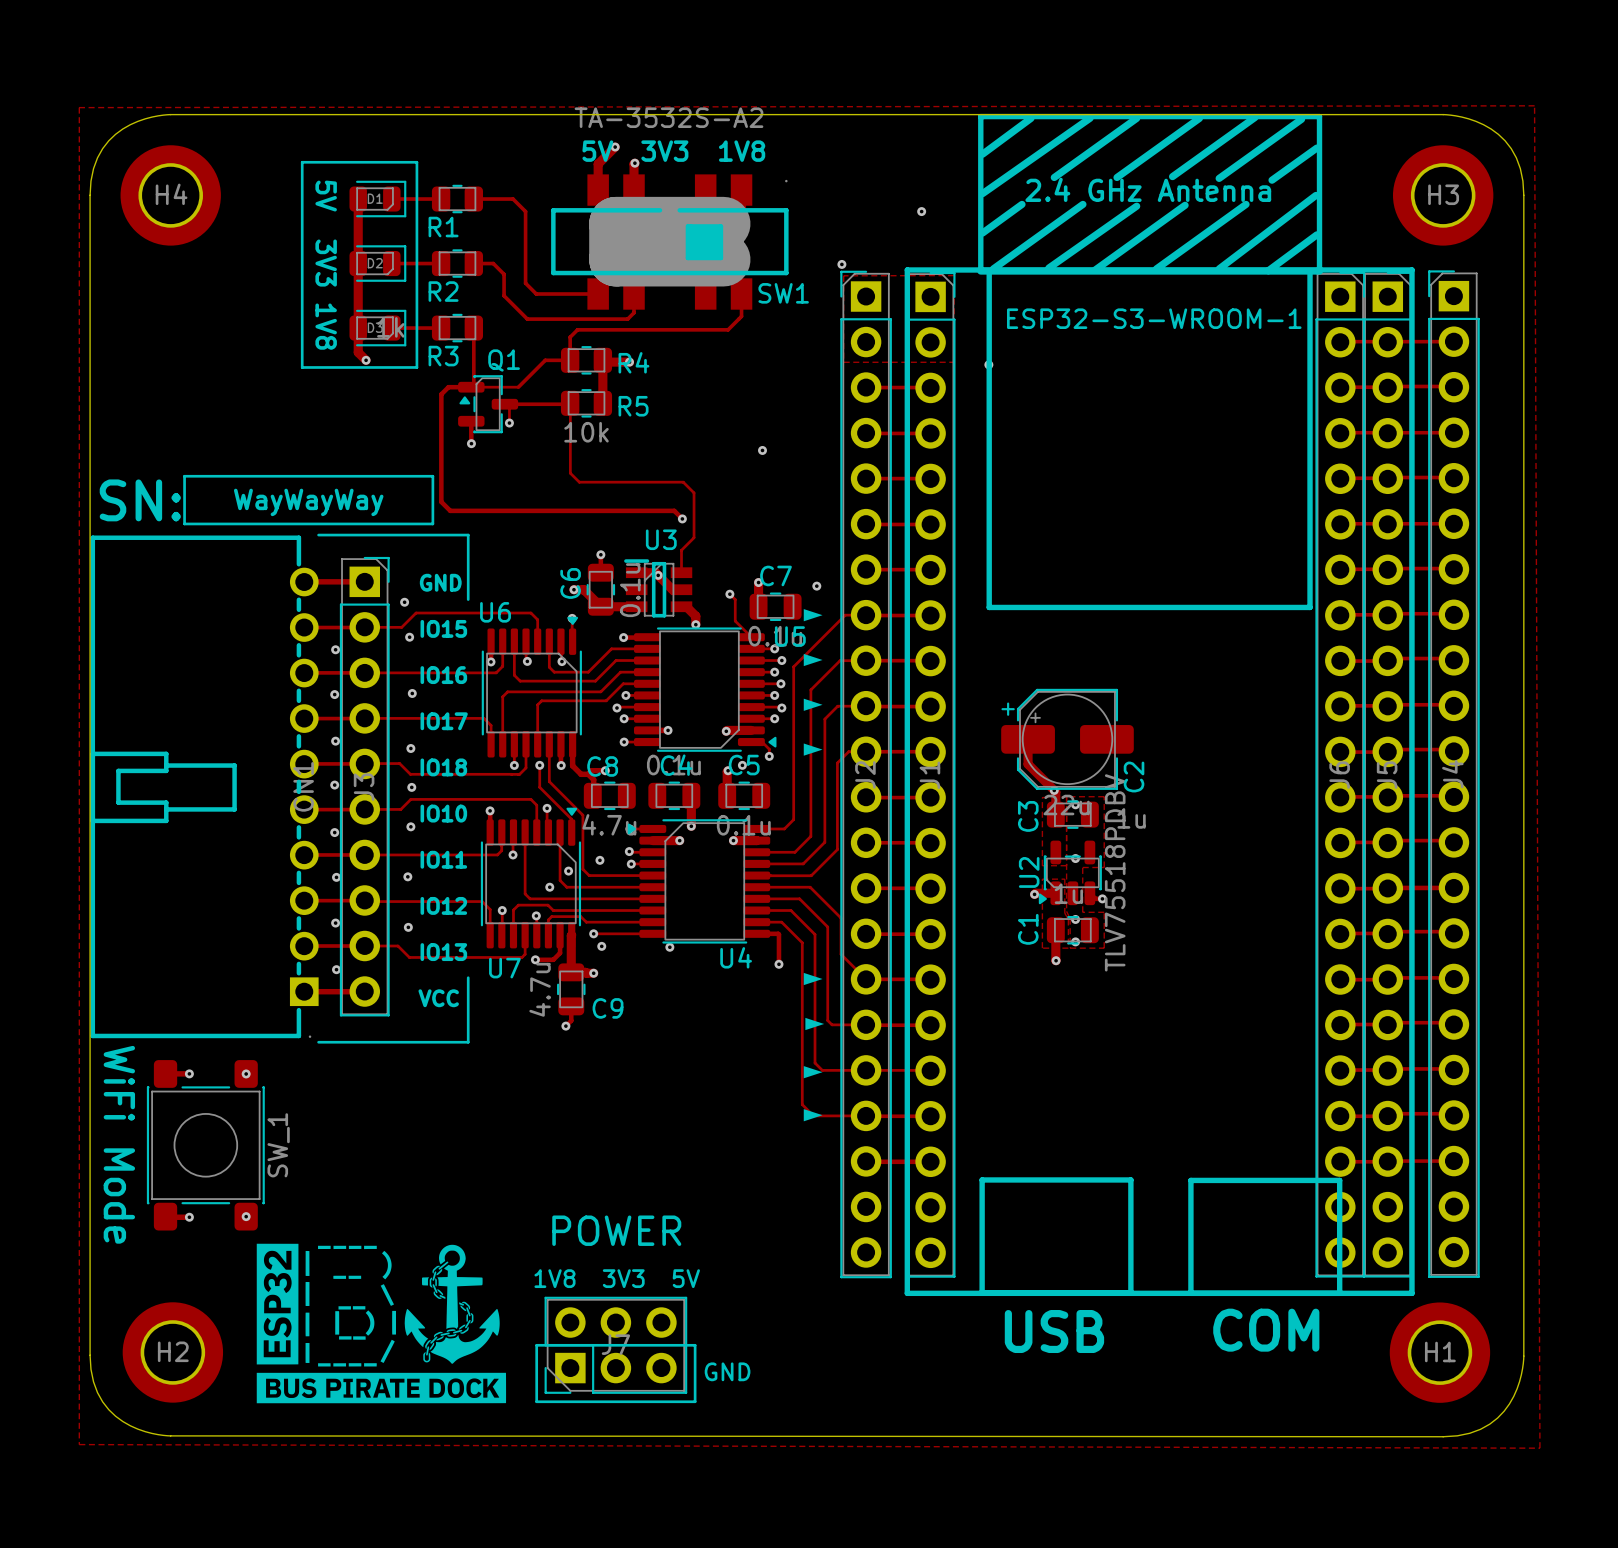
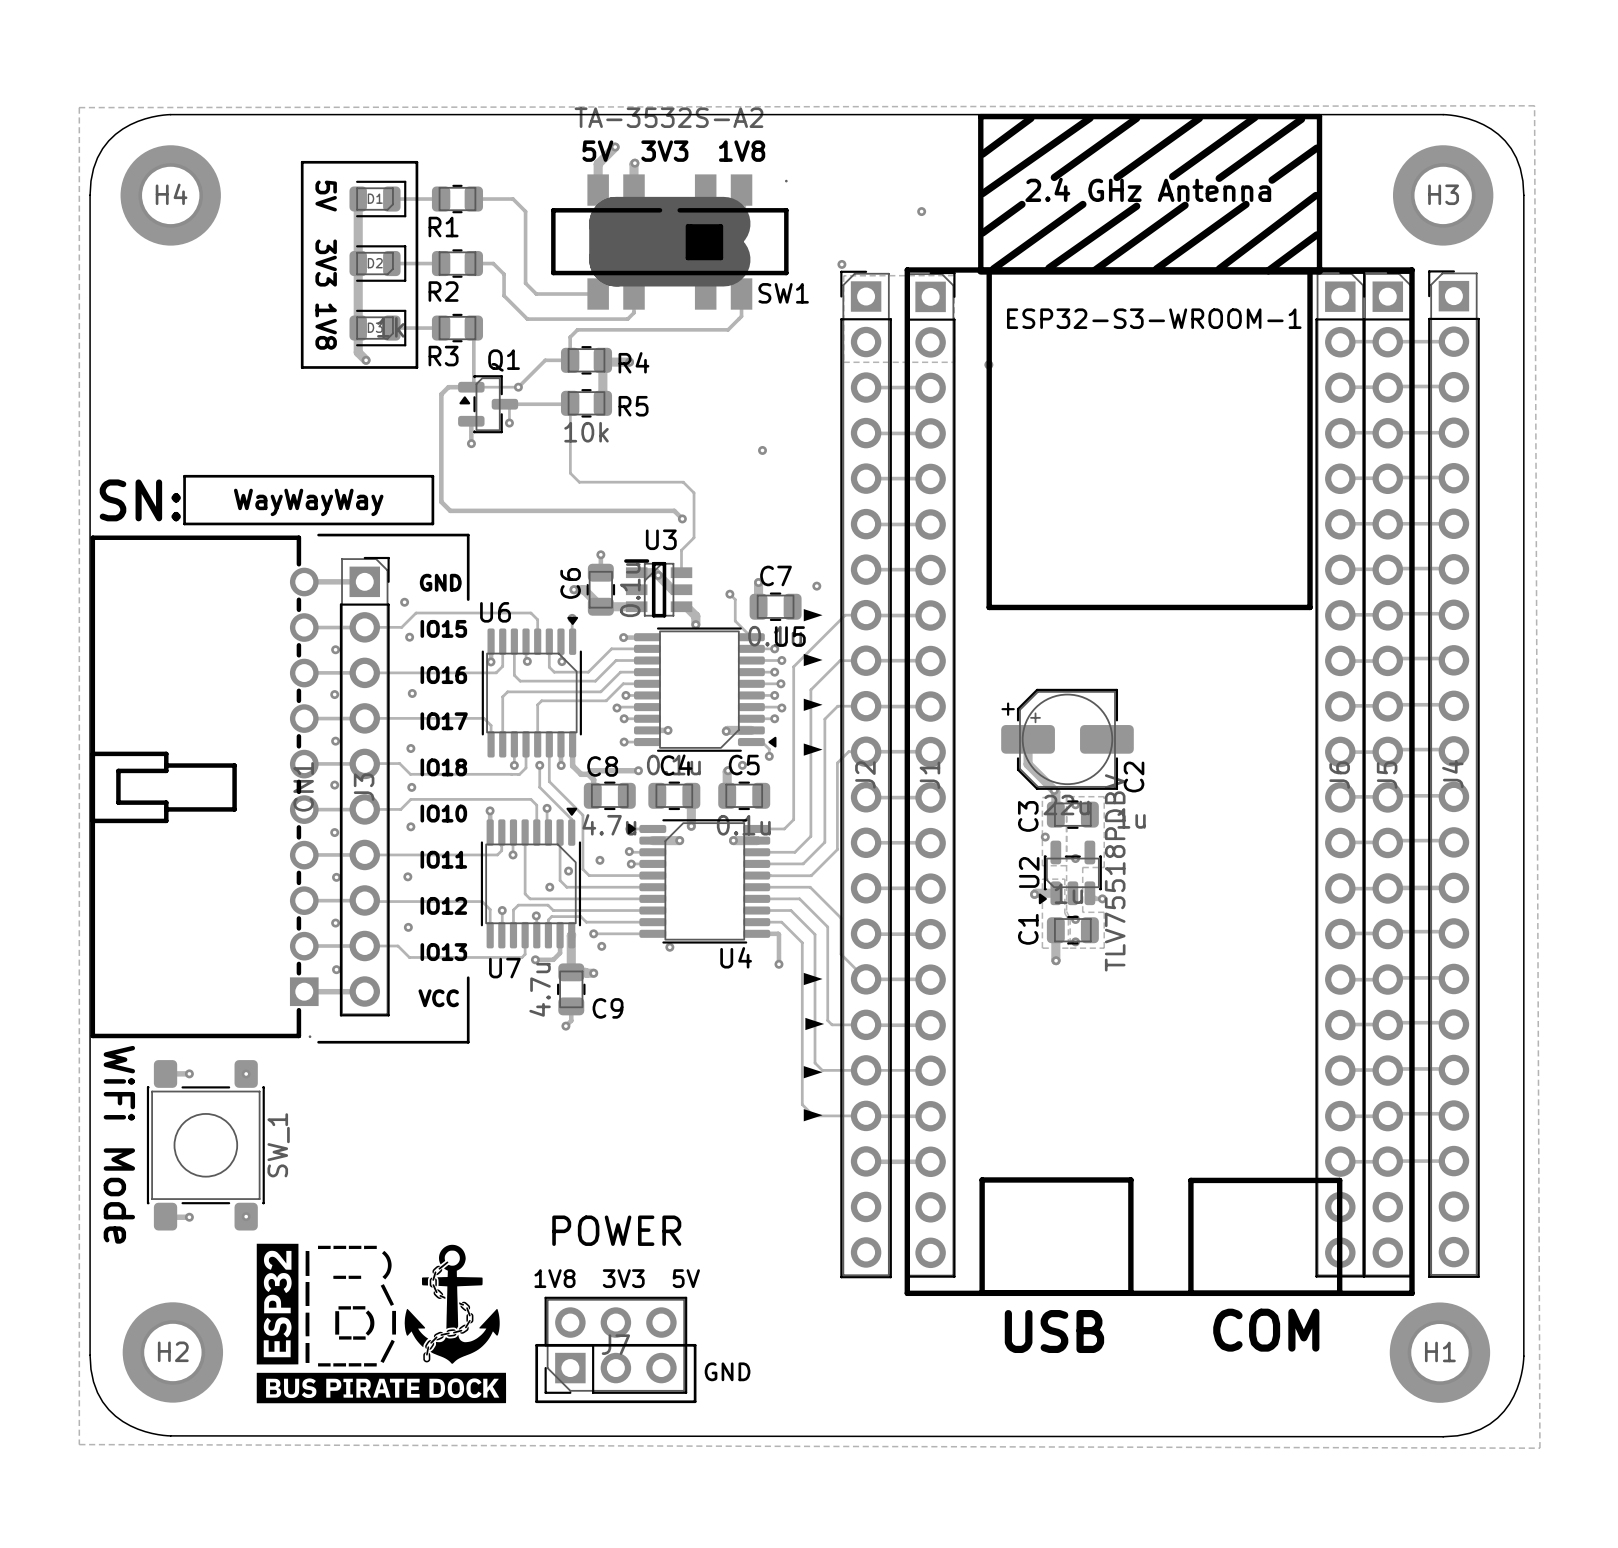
via: none -> (518, 387)
track: none -> (605, 770) (638, 770)
via position: (605, 770) -> (638, 770)
via: none -> (1045, 837)

